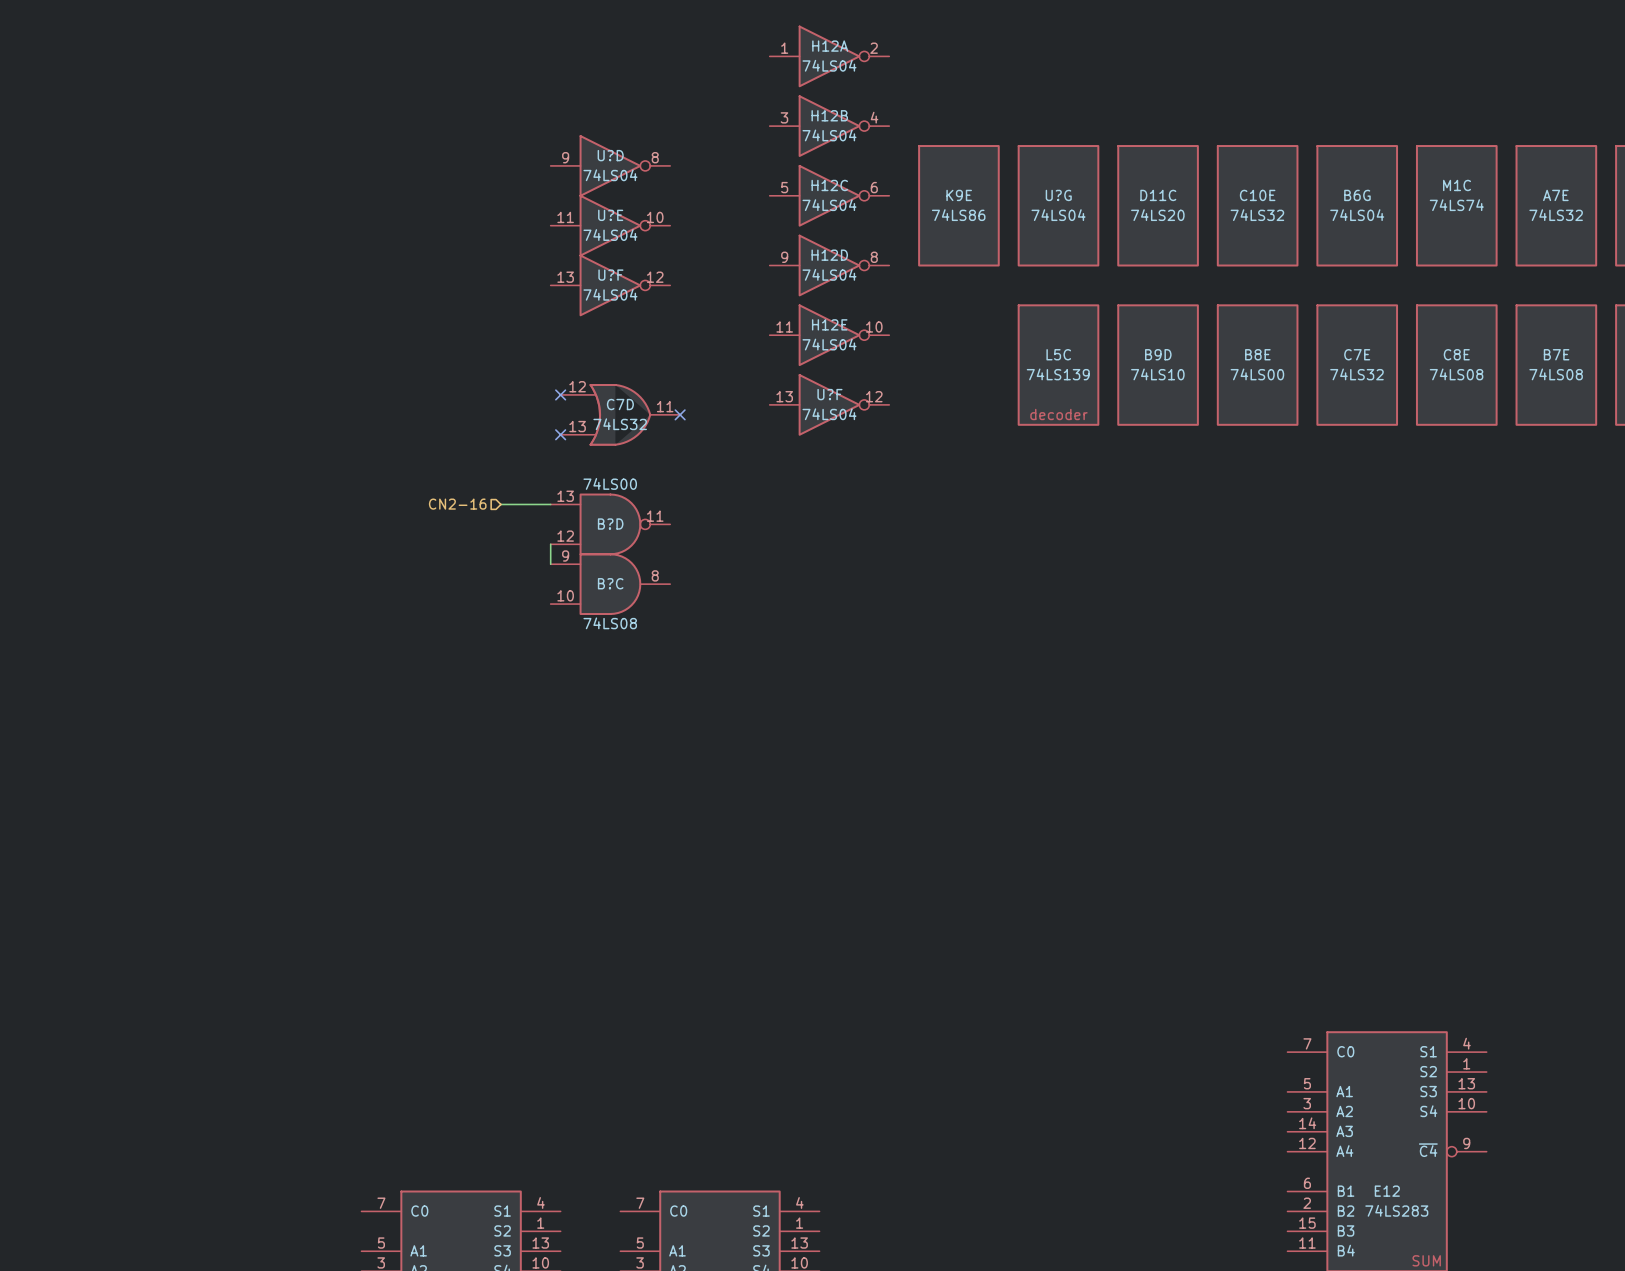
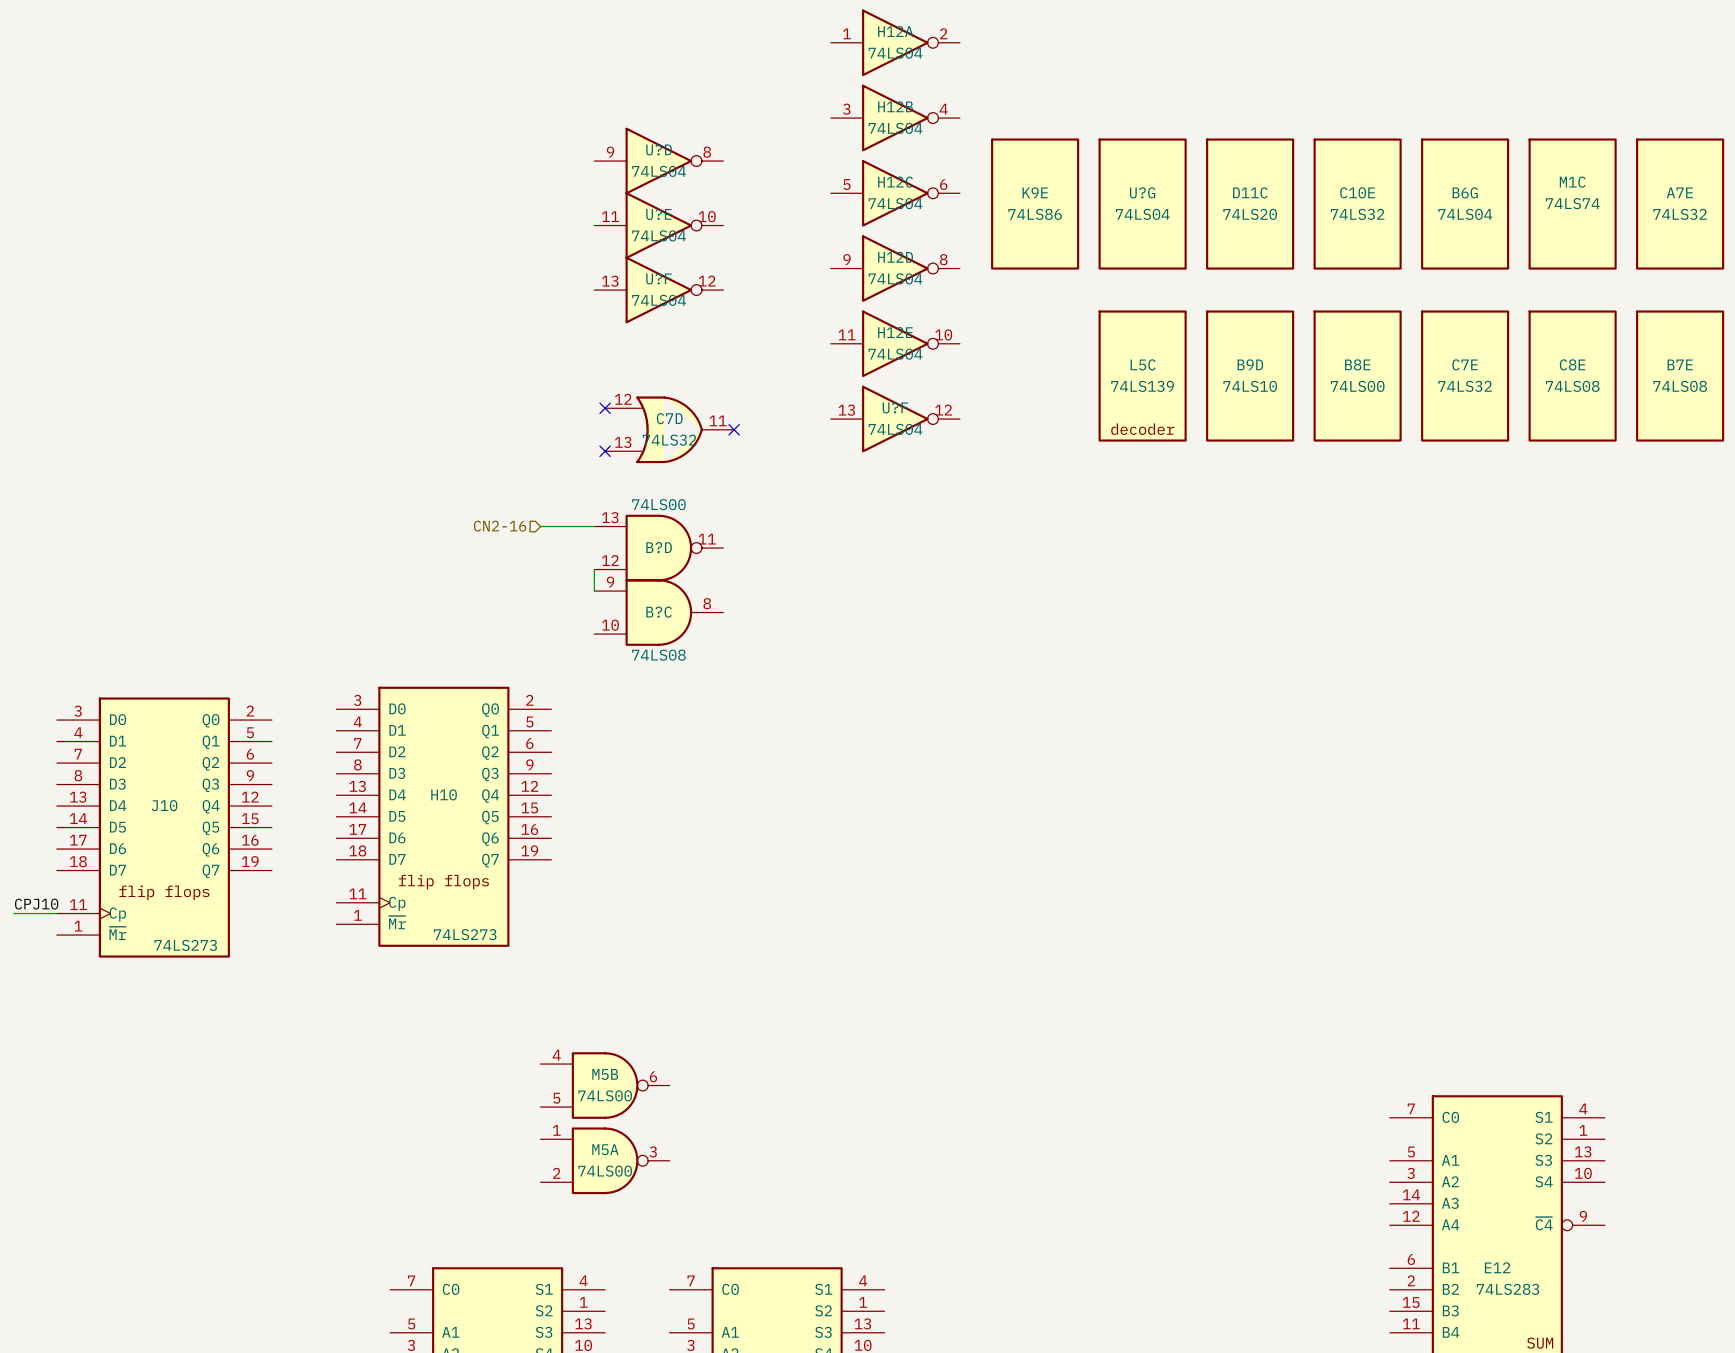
H10: none -> 74LS273 (443, 816)
J10: none -> 74LS273 (164, 827)
label: none -> CPJ10 (36, 904)
wire: none -> (13, 913) (56, 913)
M5B: none -> 74LS00 (605, 1085)
M5A: none -> 74LS00 (605, 1160)

